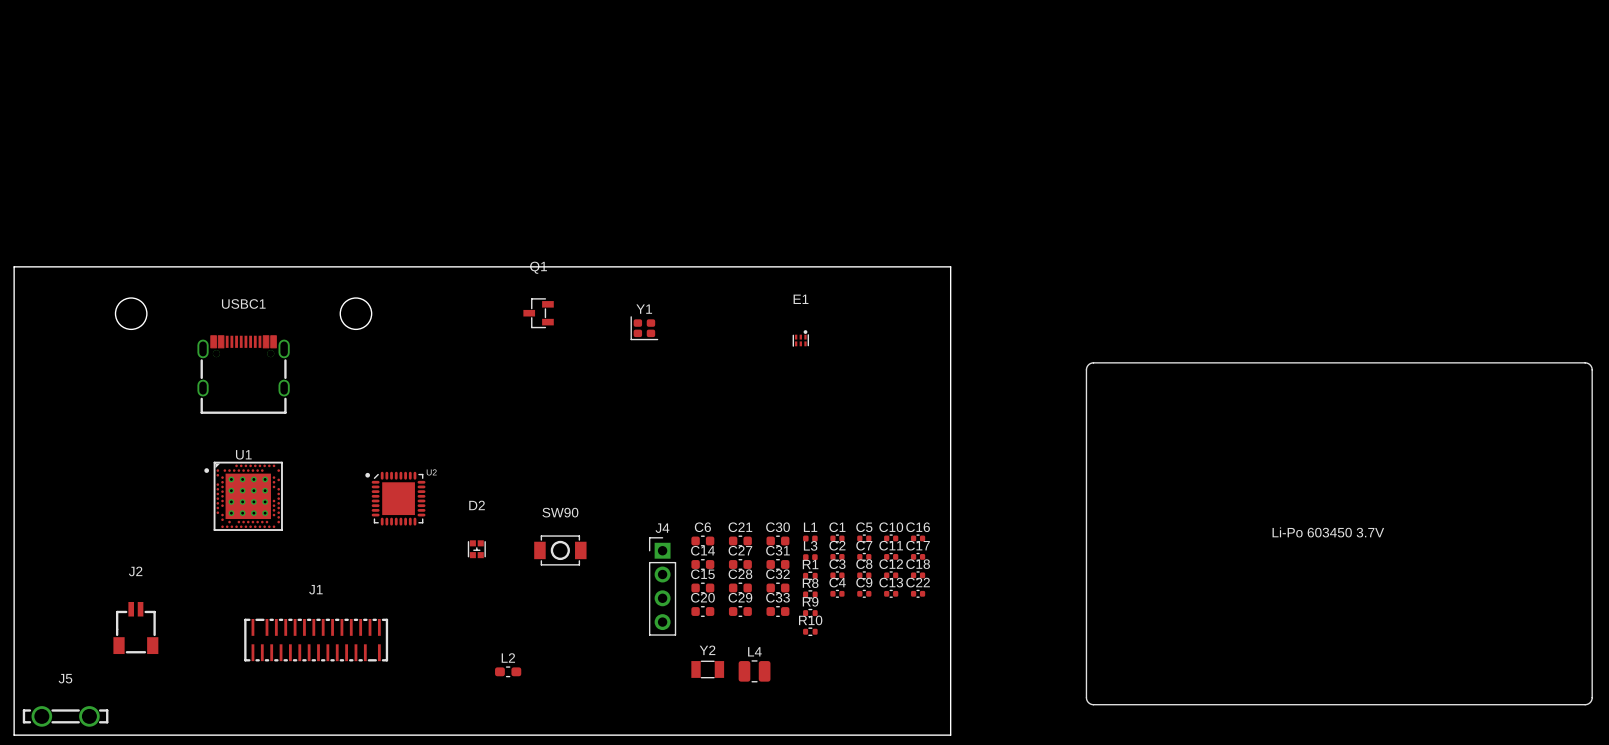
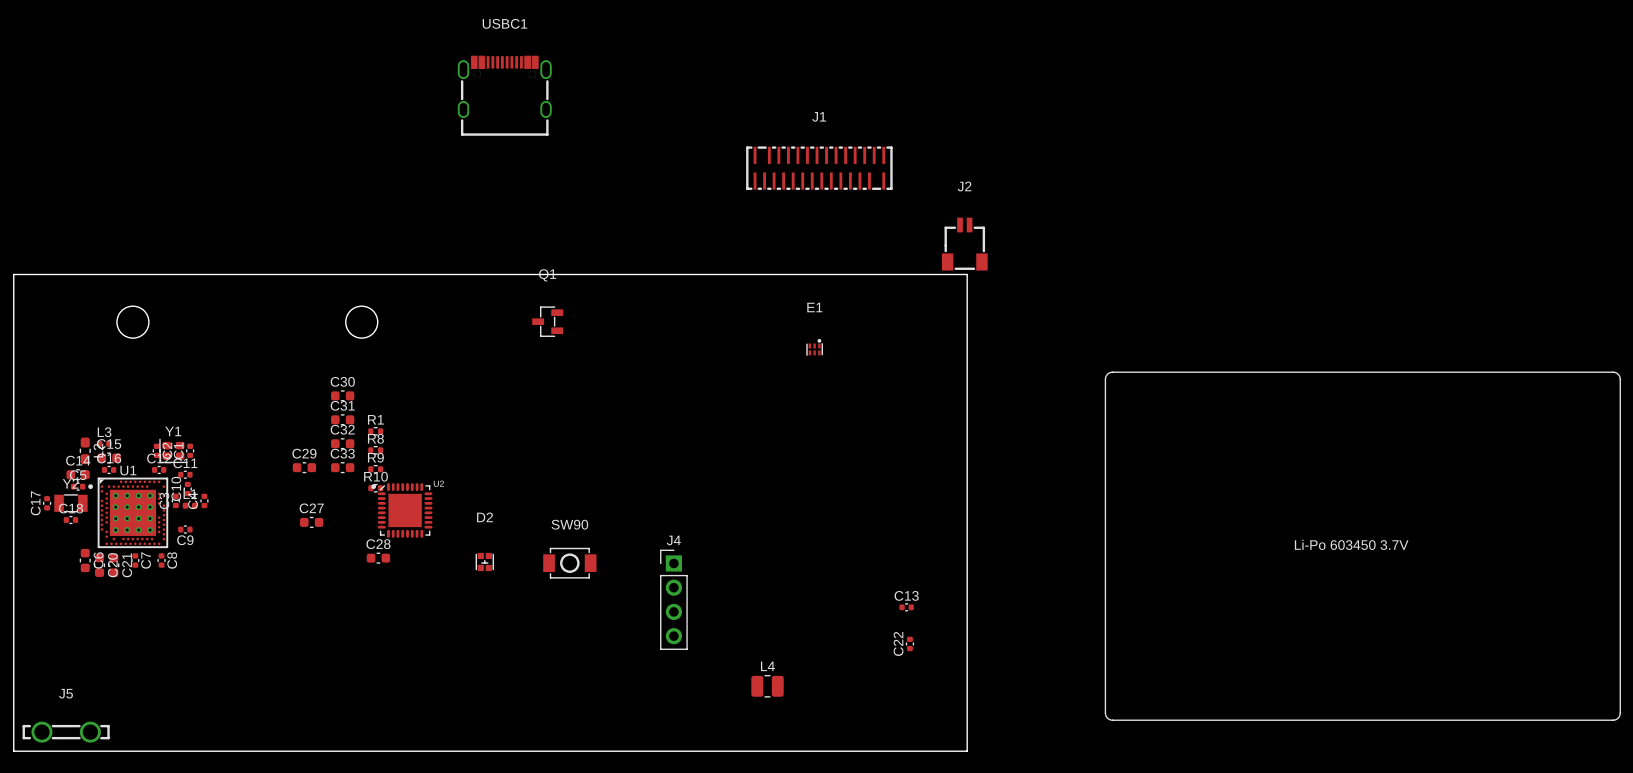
Y1 position: (644, 328) -> (173, 450)
USBC1 position: (243, 374) -> (504, 95)
U1 position: (243, 496) -> (128, 512)
L1 position: (810, 538) -> (190, 505)
C1 rotation: 0° (837, 538) -> 90° clockwise (190, 450)
C1 position: (837, 538) -> (190, 450)
C5 position: (864, 538) -> (78, 486)
C10 rotation: 0° (891, 538) -> 90° clockwise (187, 489)
C10 position: (891, 538) -> (187, 489)
C16 position: (918, 538) -> (109, 469)
C6 rotation: 0° (702, 540) -> 90° clockwise (85, 560)
C6 position: (702, 540) -> (85, 560)
C21 rotation: 0° (740, 540) -> 90° clockwise (113, 565)
C21 position: (740, 540) -> (113, 565)
C30 position: (777, 540) -> (342, 395)
C2 rotation: 0° (837, 556) -> 90° clockwise (156, 450)
C2 position: (837, 556) -> (156, 450)
C7 rotation: 0° (864, 556) -> 90° clockwise (135, 560)
C7 position: (864, 556) -> (135, 560)
C11 position: (891, 556) -> (185, 474)
C17 rotation: 0° (918, 556) -> 90° clockwise (47, 503)
C17 position: (918, 556) -> (47, 503)
L3 position: (810, 557) -> (104, 443)
C14 position: (702, 564) -> (78, 474)
C27 position: (740, 564) -> (311, 522)
C31 position: (777, 564) -> (342, 419)
R1 position: (810, 575) -> (375, 431)
C3 rotation: 0° (837, 575) -> 90° clockwise (175, 500)
C3 position: (837, 575) -> (175, 500)
C8 rotation: 0° (864, 575) -> 90° clockwise (161, 560)
C8 position: (864, 575) -> (161, 560)
C12 position: (891, 575) -> (159, 469)
C18 position: (918, 575) -> (70, 519)
C9 name position: C9 (864, 582) -> C9 (185, 540)
C15 position: (702, 588) -> (109, 458)
C28 position: (740, 588) -> (378, 558)
C32 position: (777, 588) -> (342, 443)
C4 rotation: 0° (837, 593) -> 90° clockwise (204, 500)
C4 position: (837, 593) -> (204, 500)
C9 position: (864, 593) -> (185, 529)
C22 rotation: 0° (918, 593) -> 90° clockwise (909, 643)
C22 position: (918, 593) -> (909, 643)
R8 position: (810, 594) -> (375, 450)
C20 rotation: 0° (702, 611) -> 90° clockwise (99, 565)
C20 position: (702, 611) -> (99, 565)
C29 position: (740, 611) -> (304, 467)
C33 position: (777, 611) -> (342, 467)
R9 position: (810, 613) -> (375, 469)
J2 position: (135, 628) -> (964, 244)
R10 position: (810, 631) -> (375, 488)
J1 position: (316, 640) -> (819, 168)
Y2 position: (707, 669) -> (70, 503)
L2 rotation: 0° (508, 671) -> 90° clockwise (85, 450)
L2 position: (508, 671) -> (85, 450)

